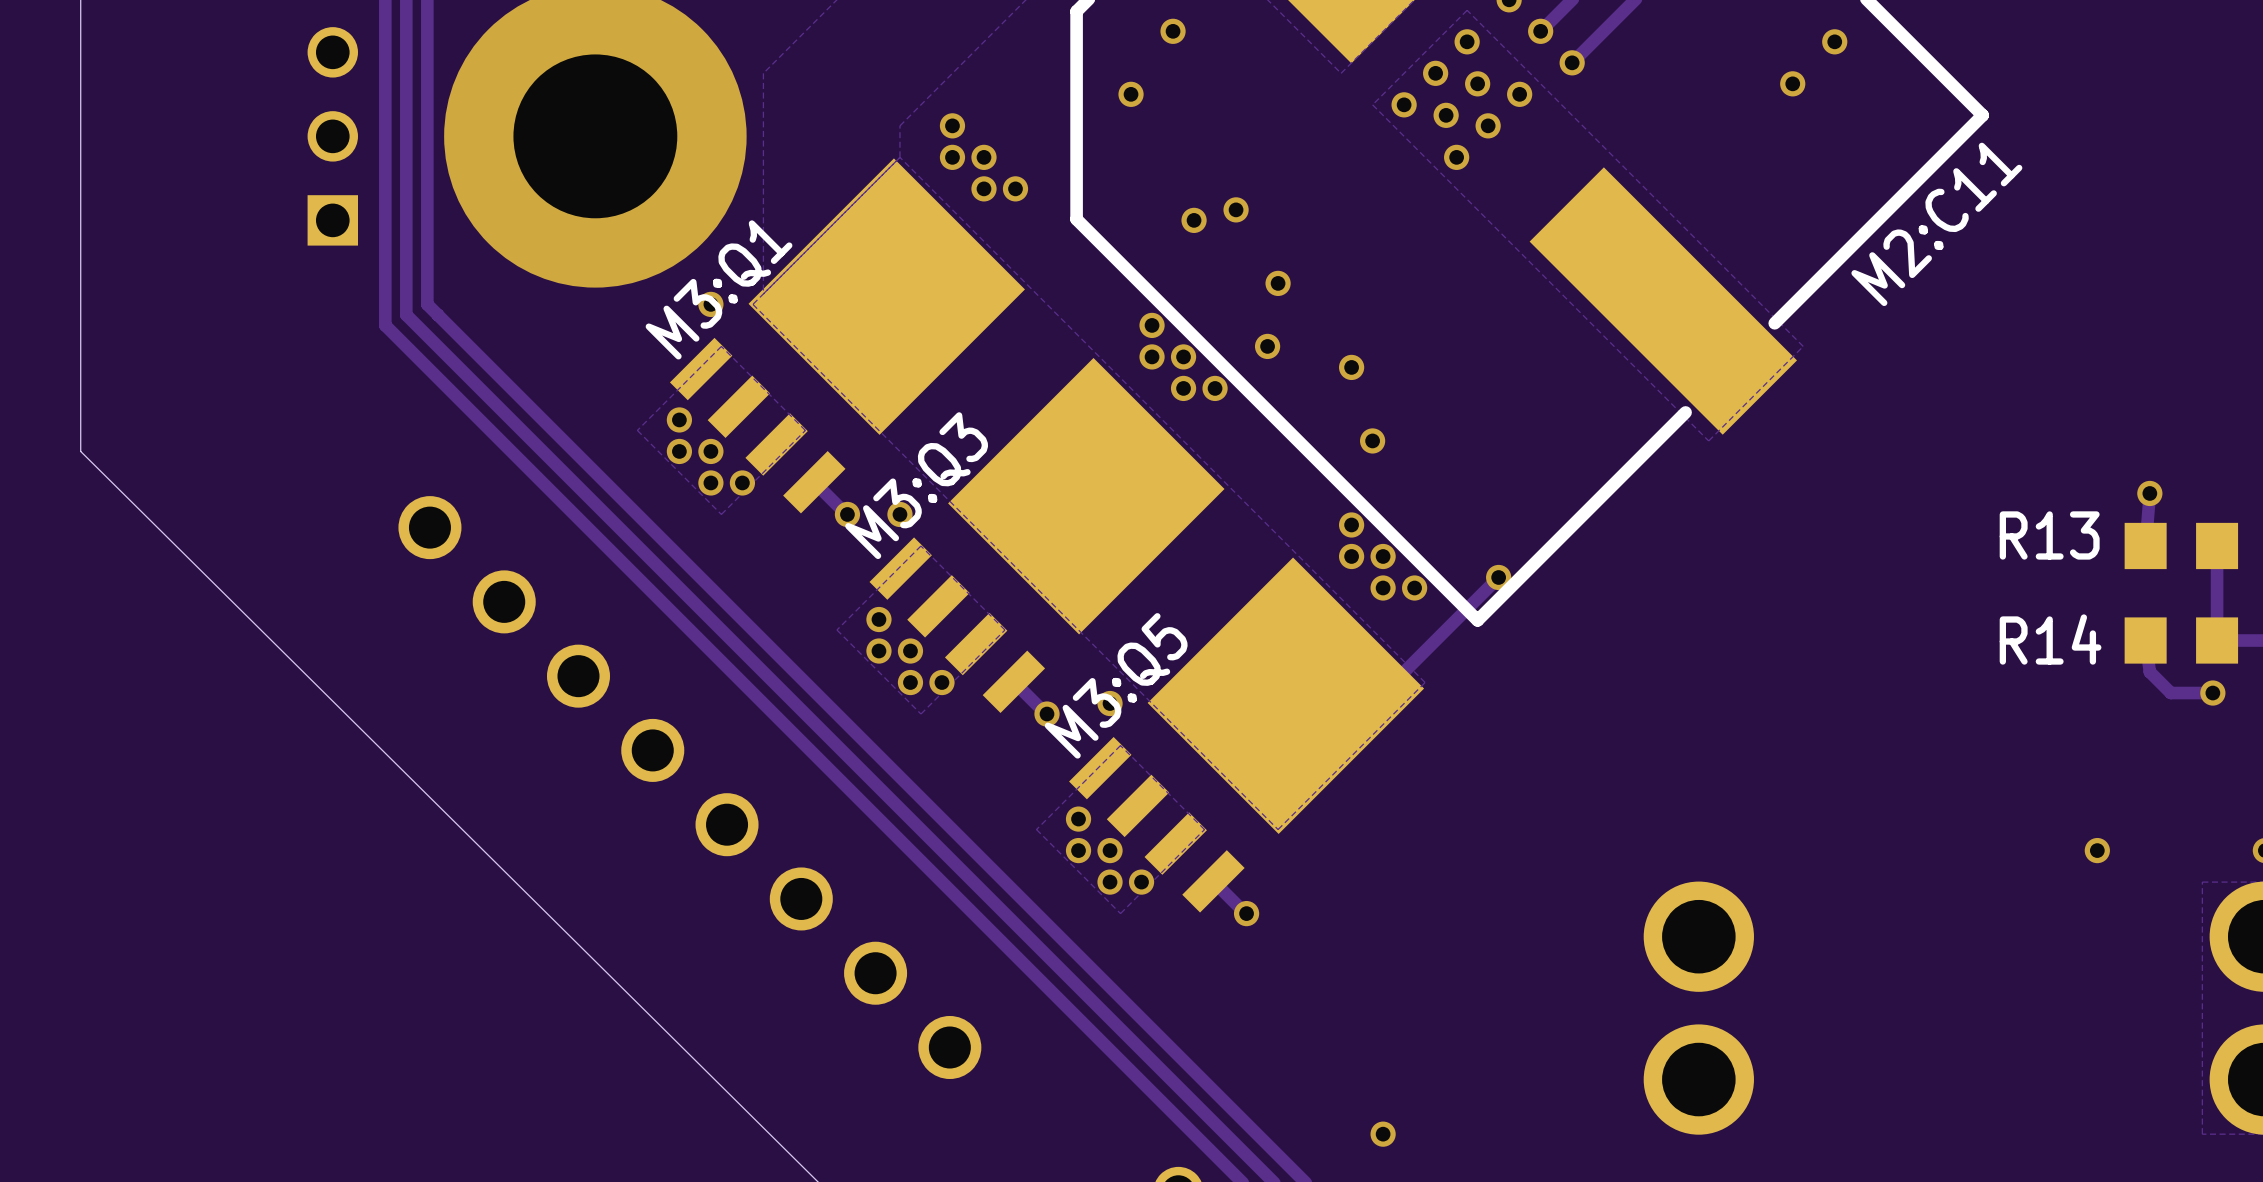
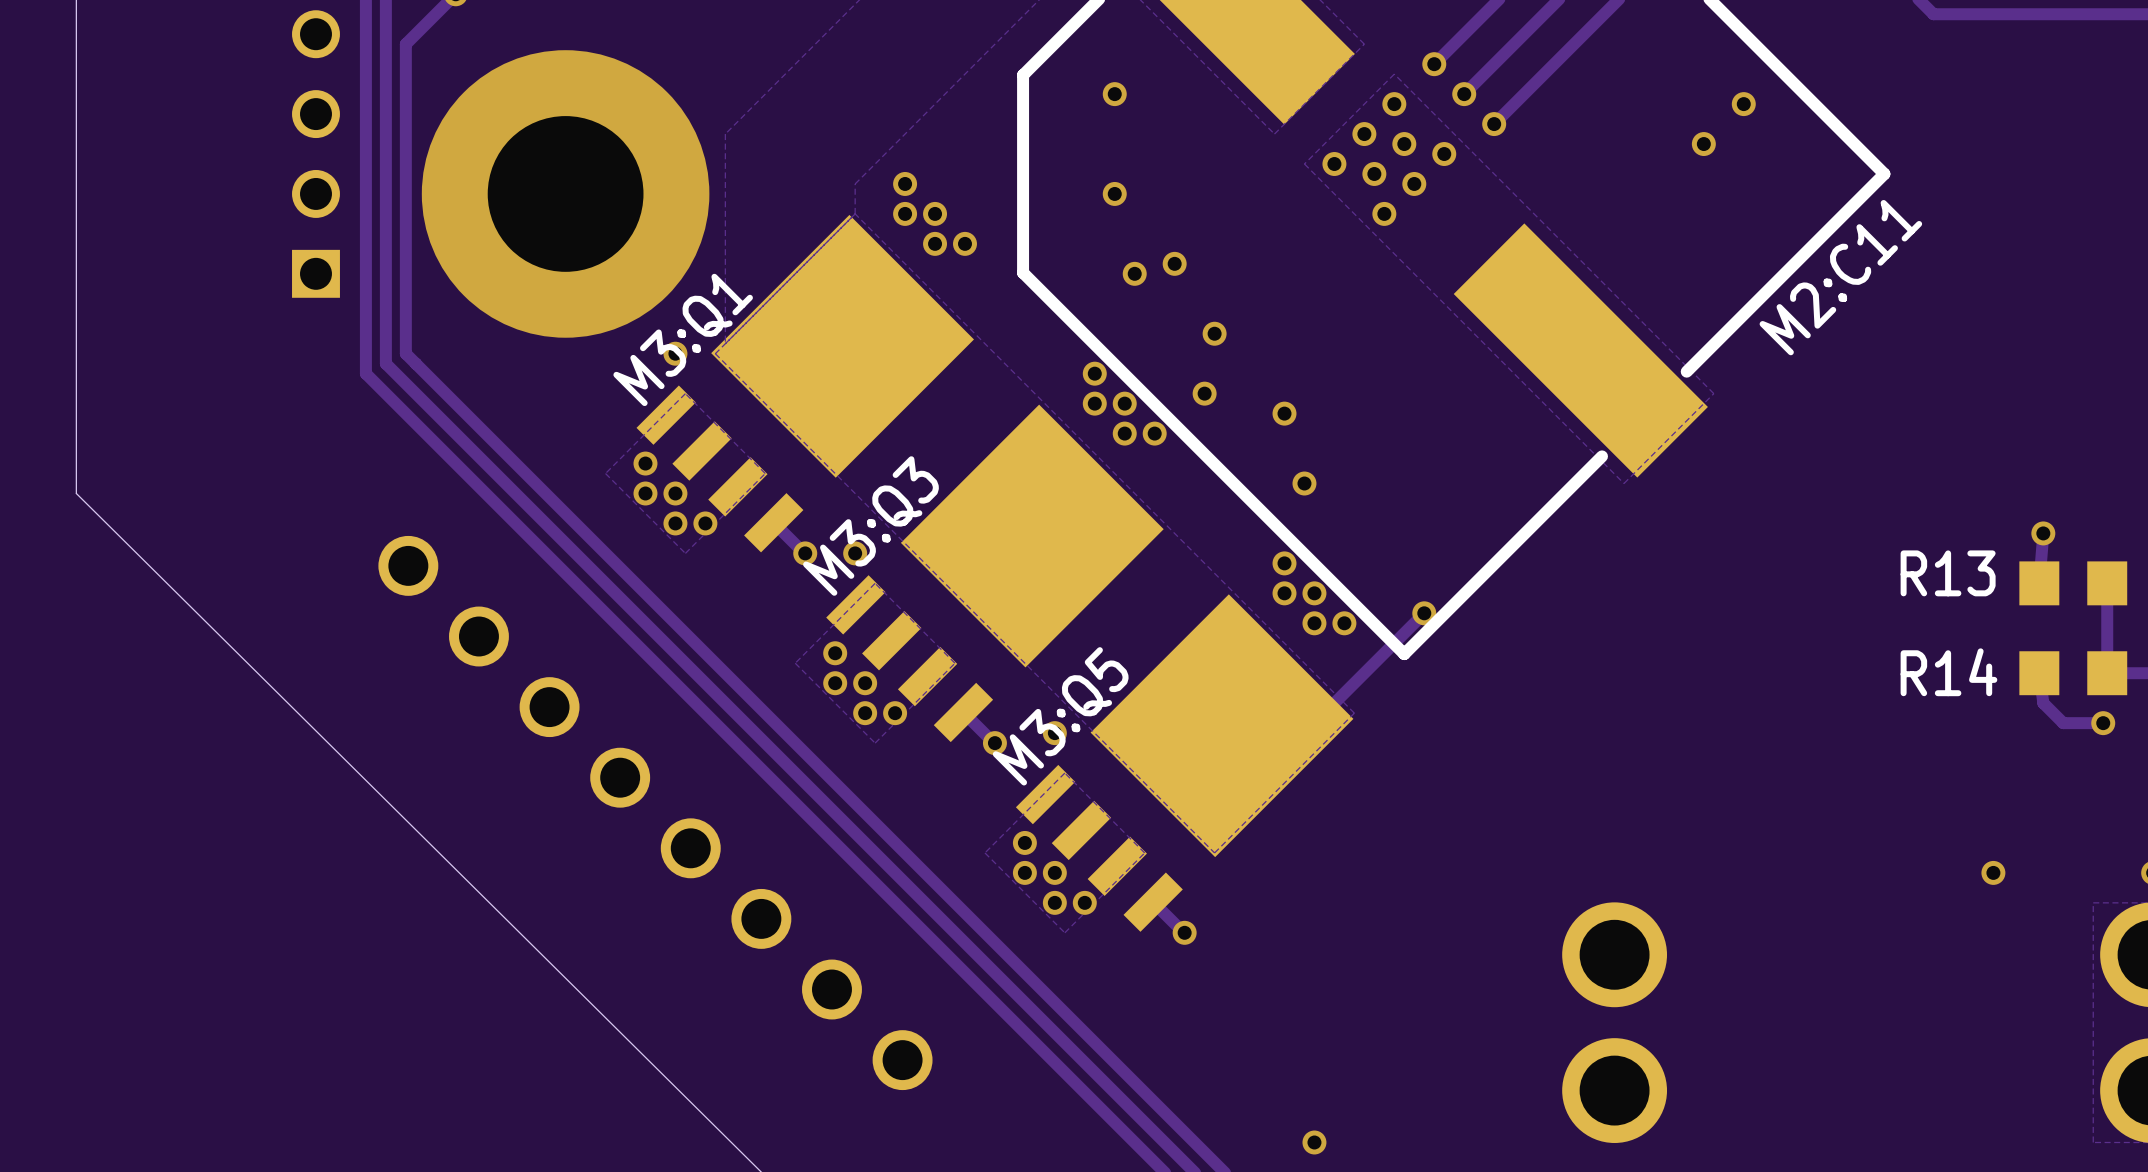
via position: (1131, 94) -> (1114, 193)

